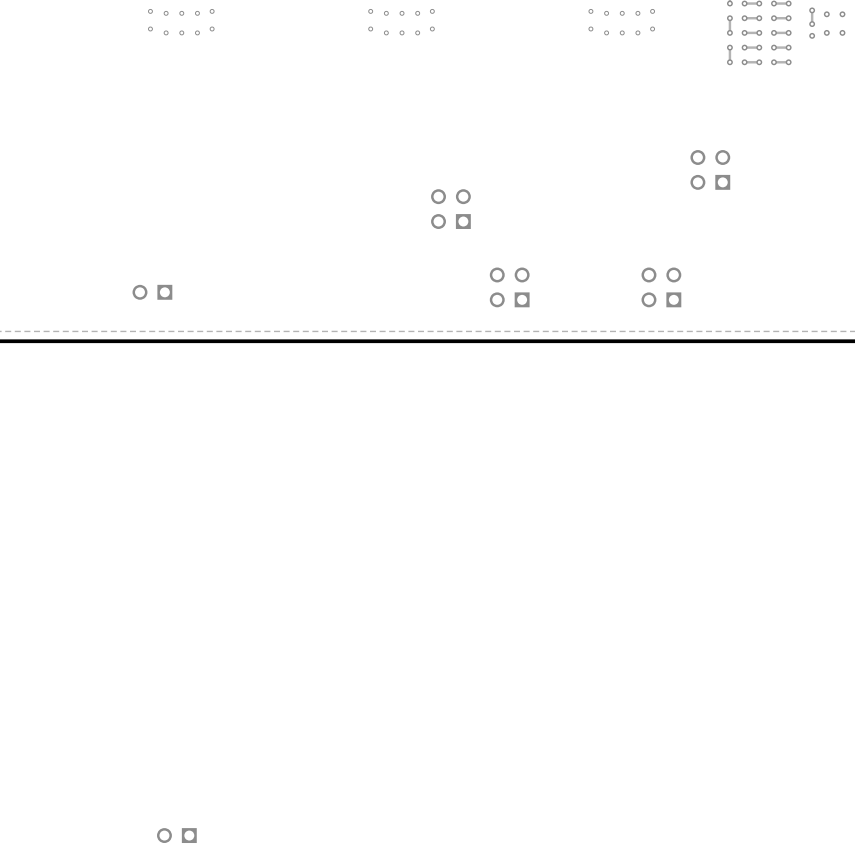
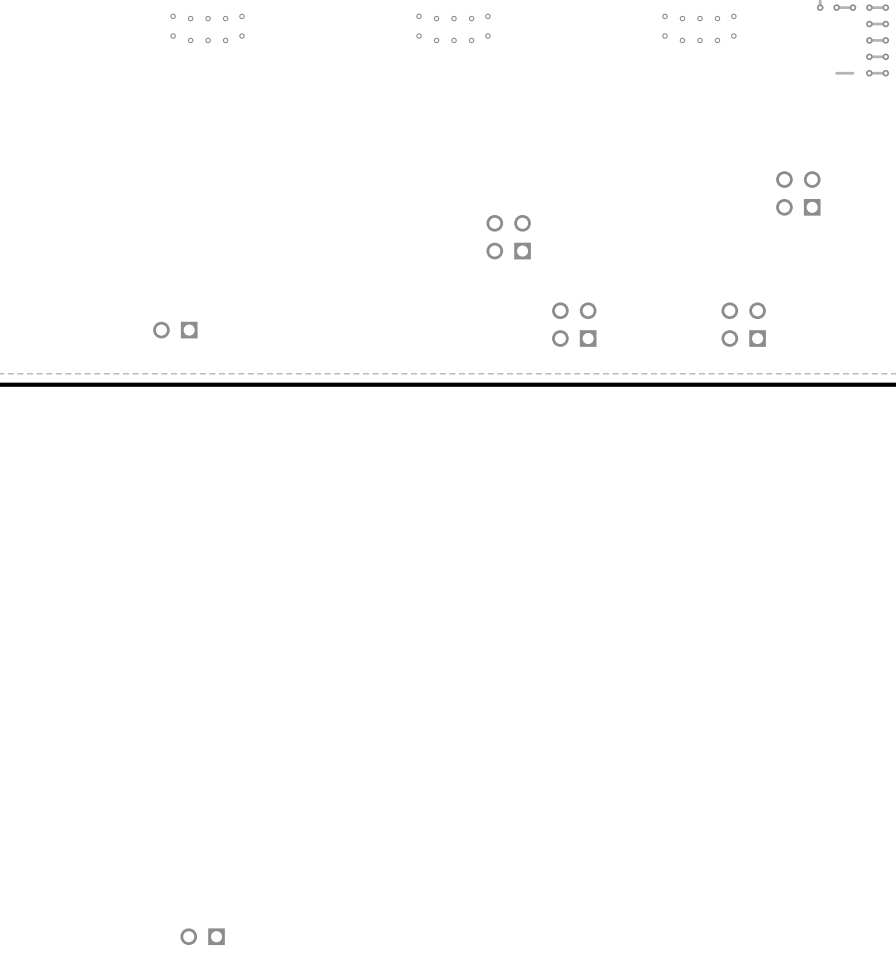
track: (729, 18) (729, 32) -> none
via: (729, 18) -> none
via: (744, 18) -> none
track: (759, 18) (744, 18) -> none
via: (759, 18) -> none
via: (729, 32) -> none
via: (744, 32) -> none
track: (759, 32) (744, 32) -> none
via: (759, 32) -> none
track: (729, 47) (729, 62) -> none
via: (729, 47) -> none
via: (744, 47) -> none
track: (759, 47) (744, 47) -> none
via: (759, 47) -> none
via: (729, 62) -> none
via: (744, 62) -> none
via: (759, 62) -> none

